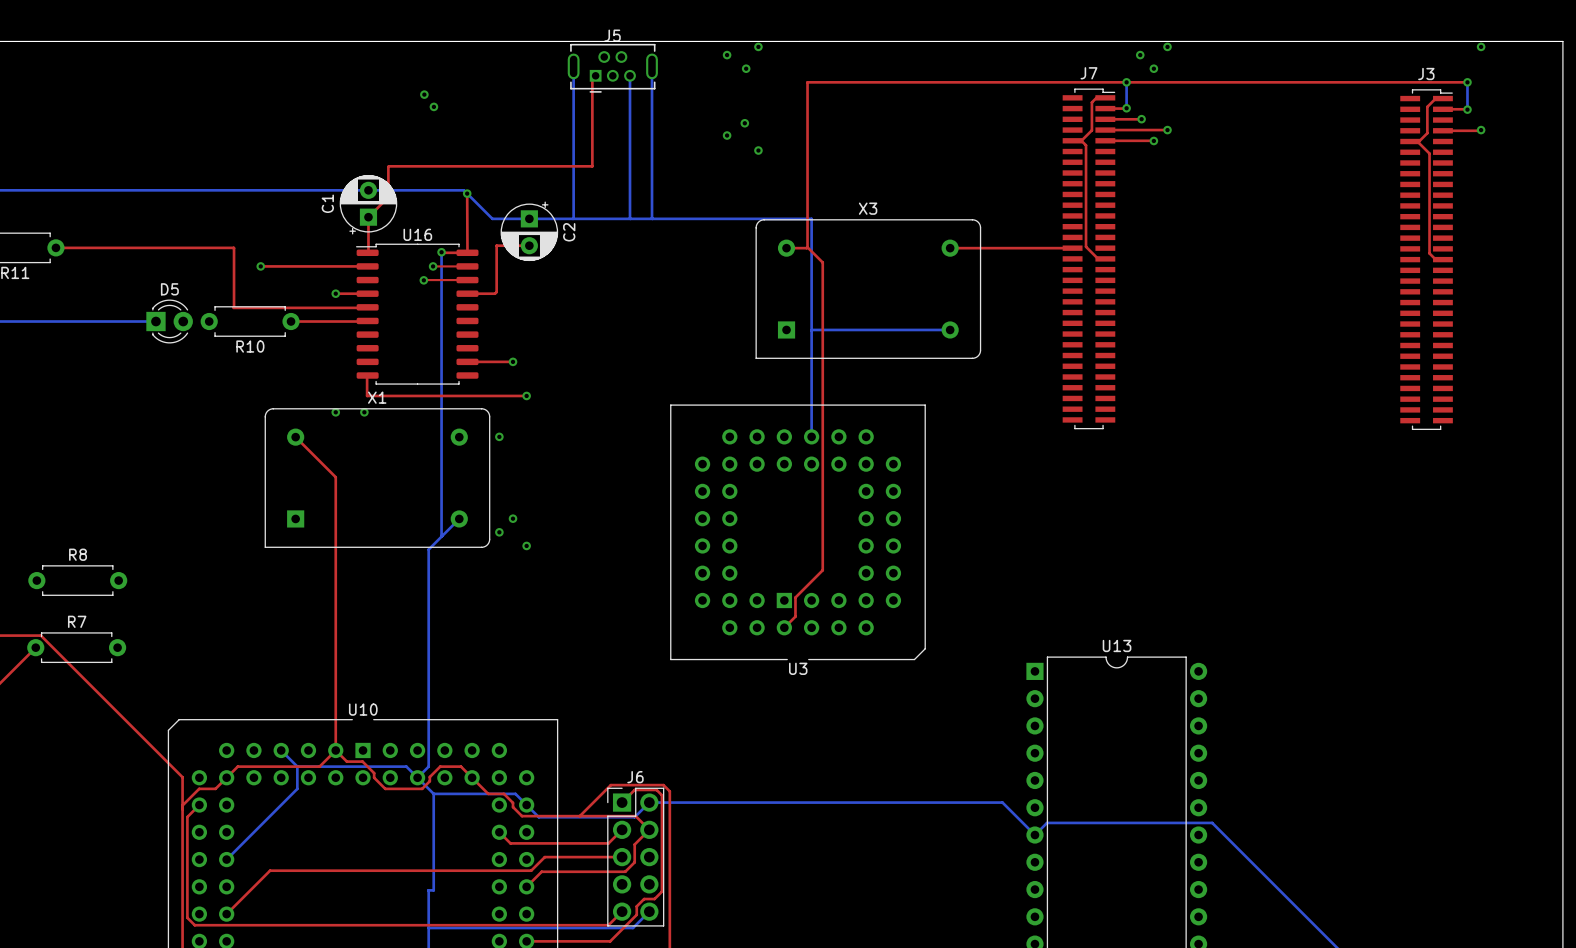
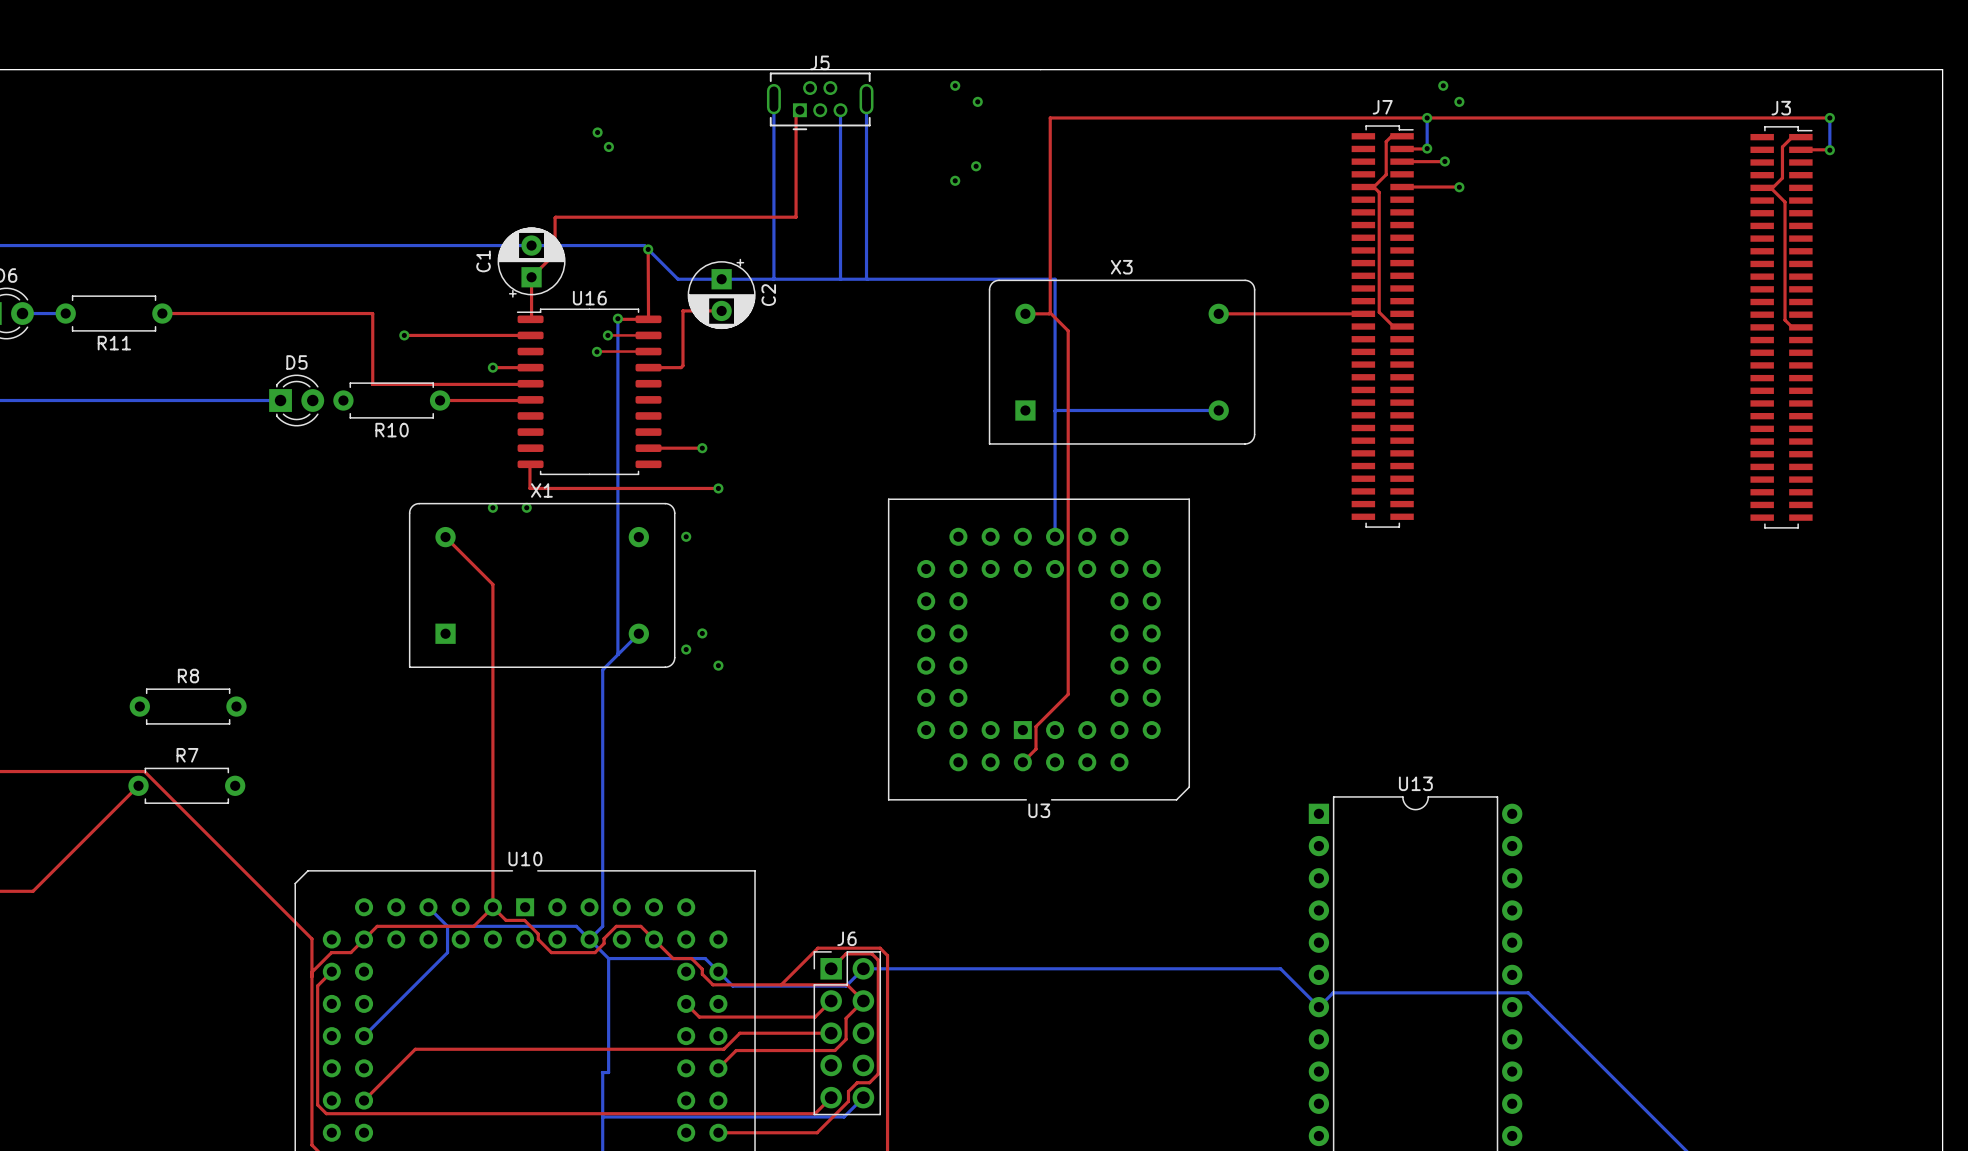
via: (758, 46) -> none
via: (1167, 46) -> none
via: (1481, 46) -> none
top track: (1105, 130) (1167, 130) -> none
via: (1167, 130) -> none
top track: (1481, 130) (1442, 130) -> none
via: (1481, 130) -> none
via: (758, 150) -> none

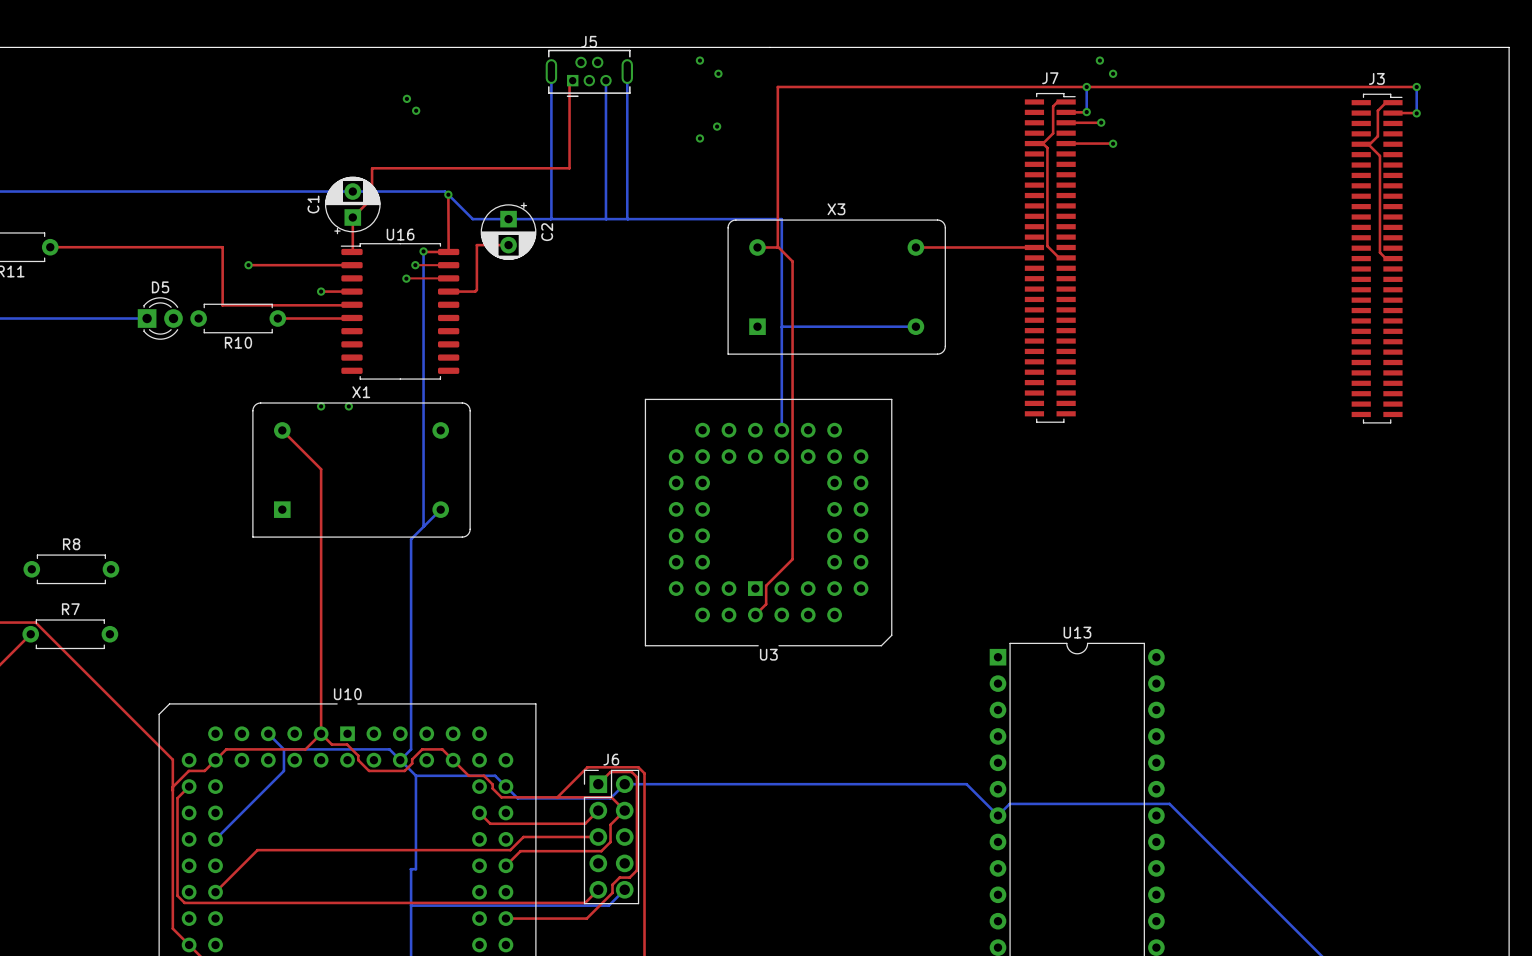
top track: (648, 448) (702, 448) -> none
via: (702, 448) -> none
top track: (530, 464) (529, 488) (718, 488) -> none
via: (718, 488) -> none
via: (686, 536) -> none
via: (702, 633) -> none
via: (686, 649) -> none
via: (718, 665) -> none

